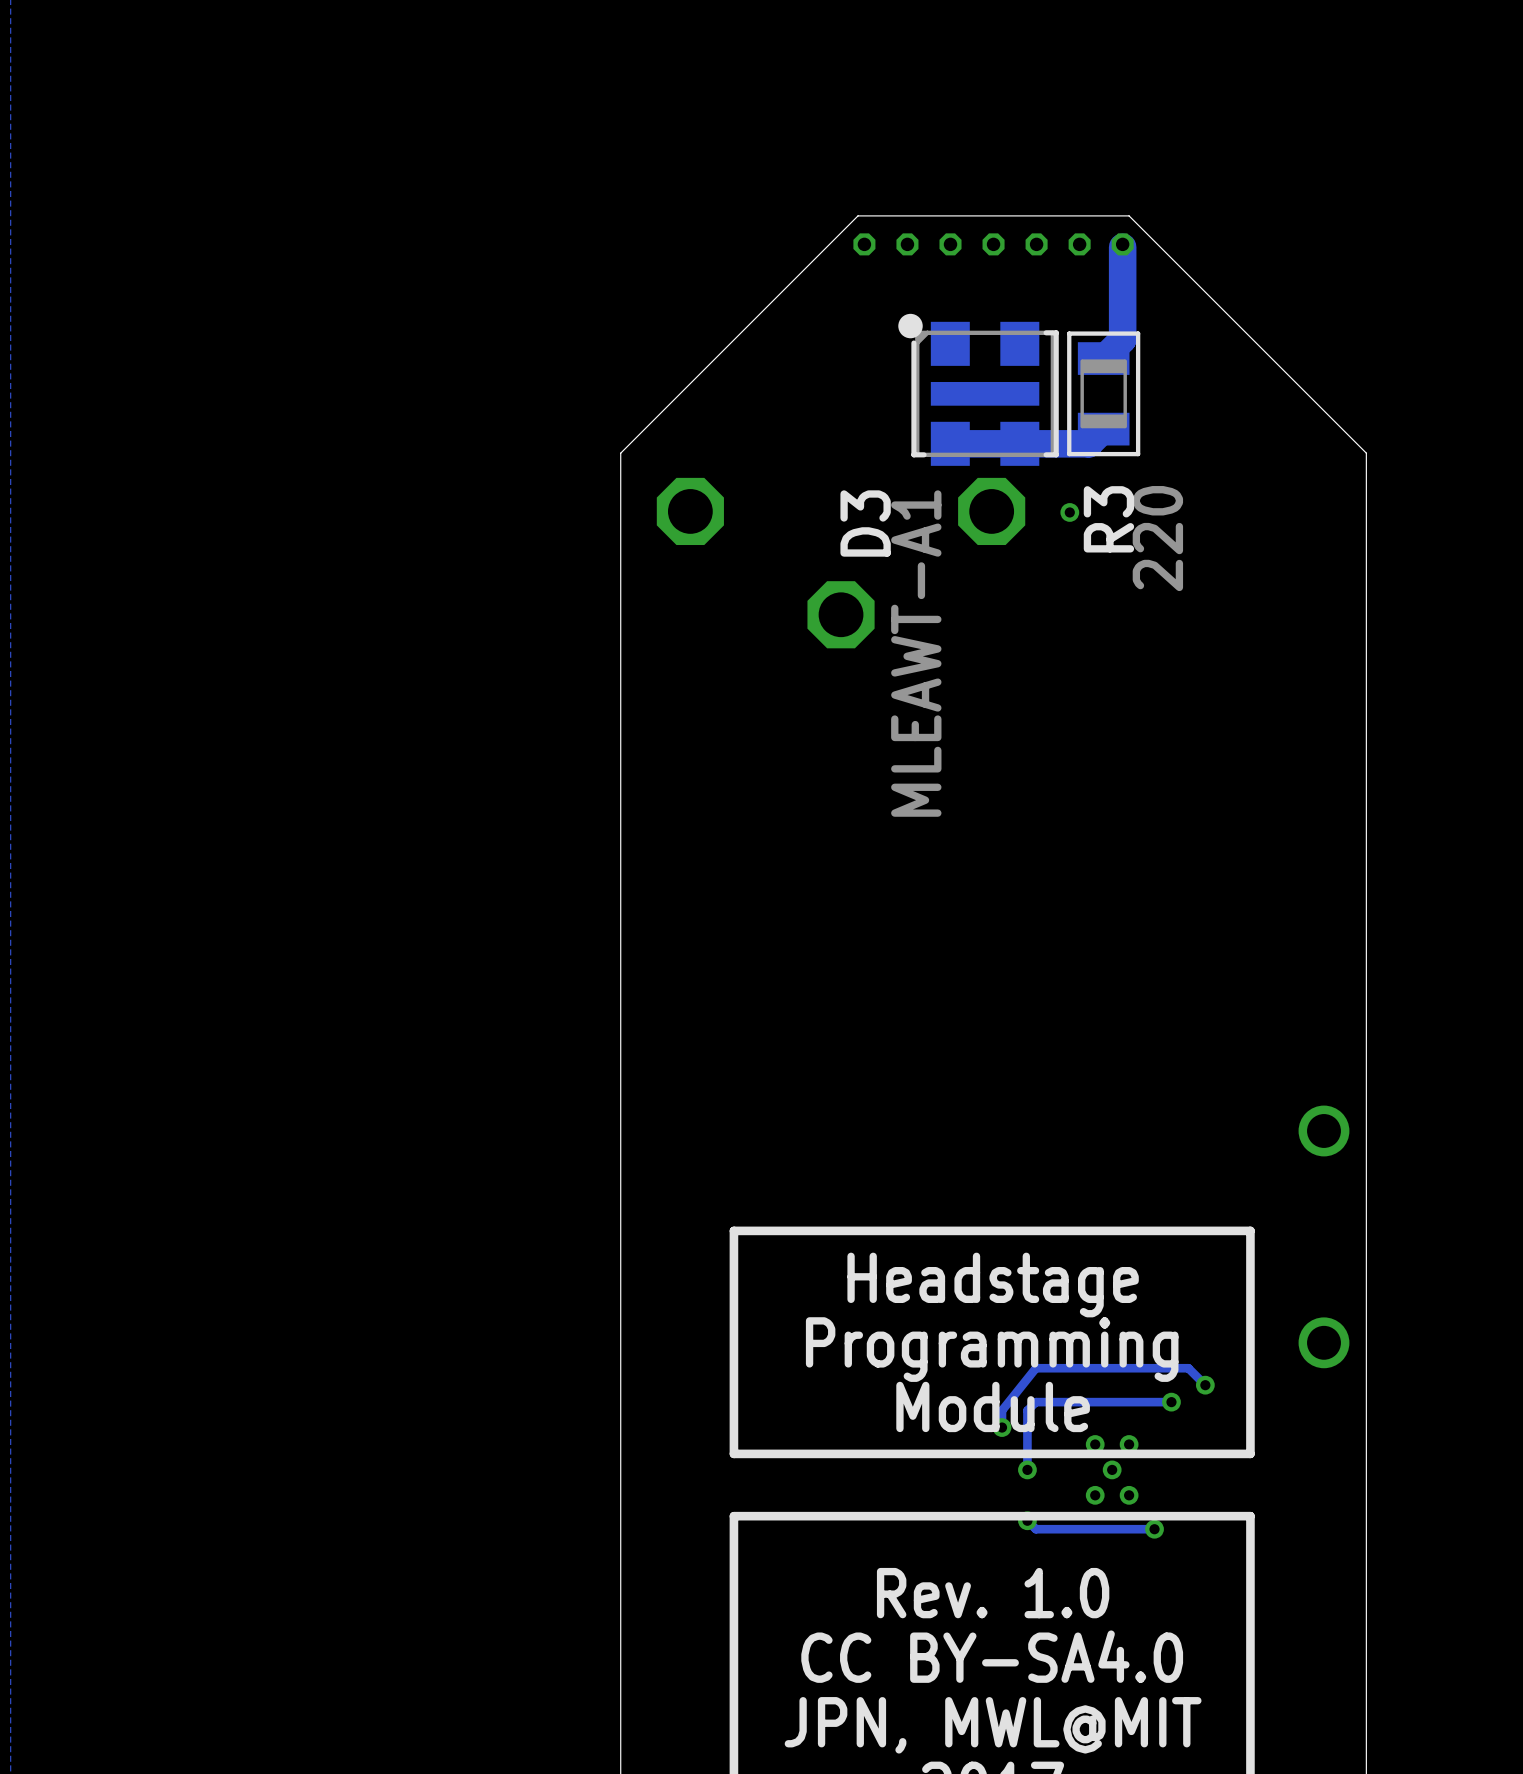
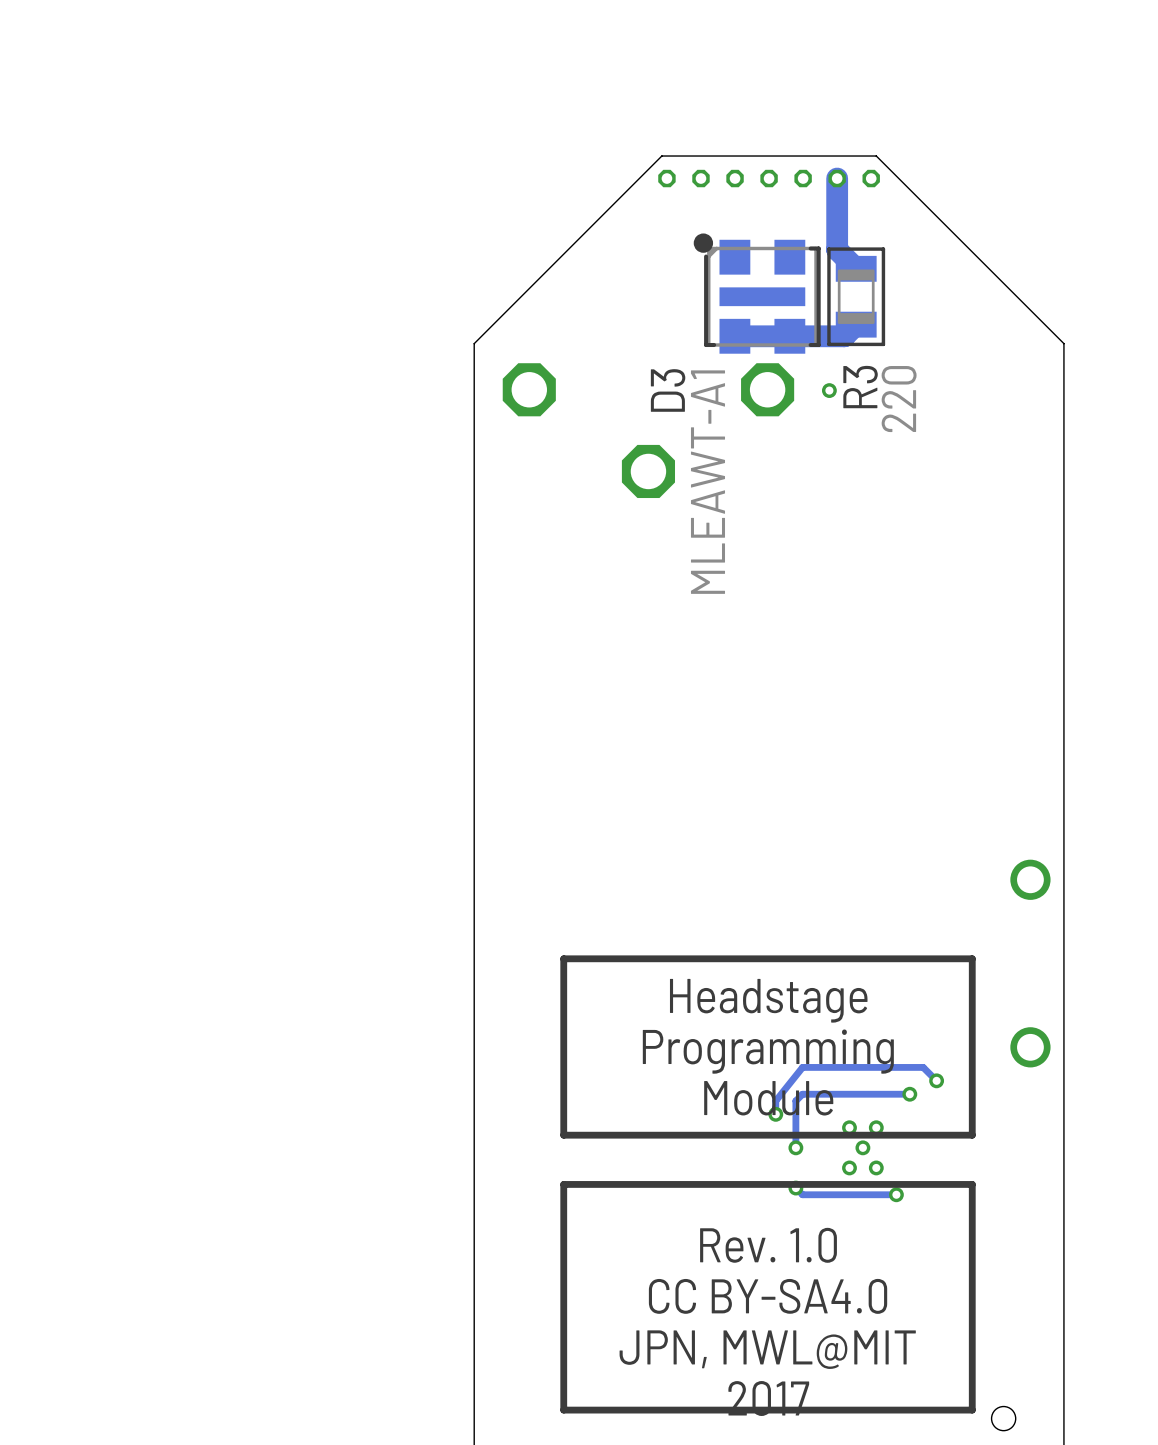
track: (1122, 244) (1122, 339) (1103, 358) -> (837, 178) (837, 249) (856, 268)

